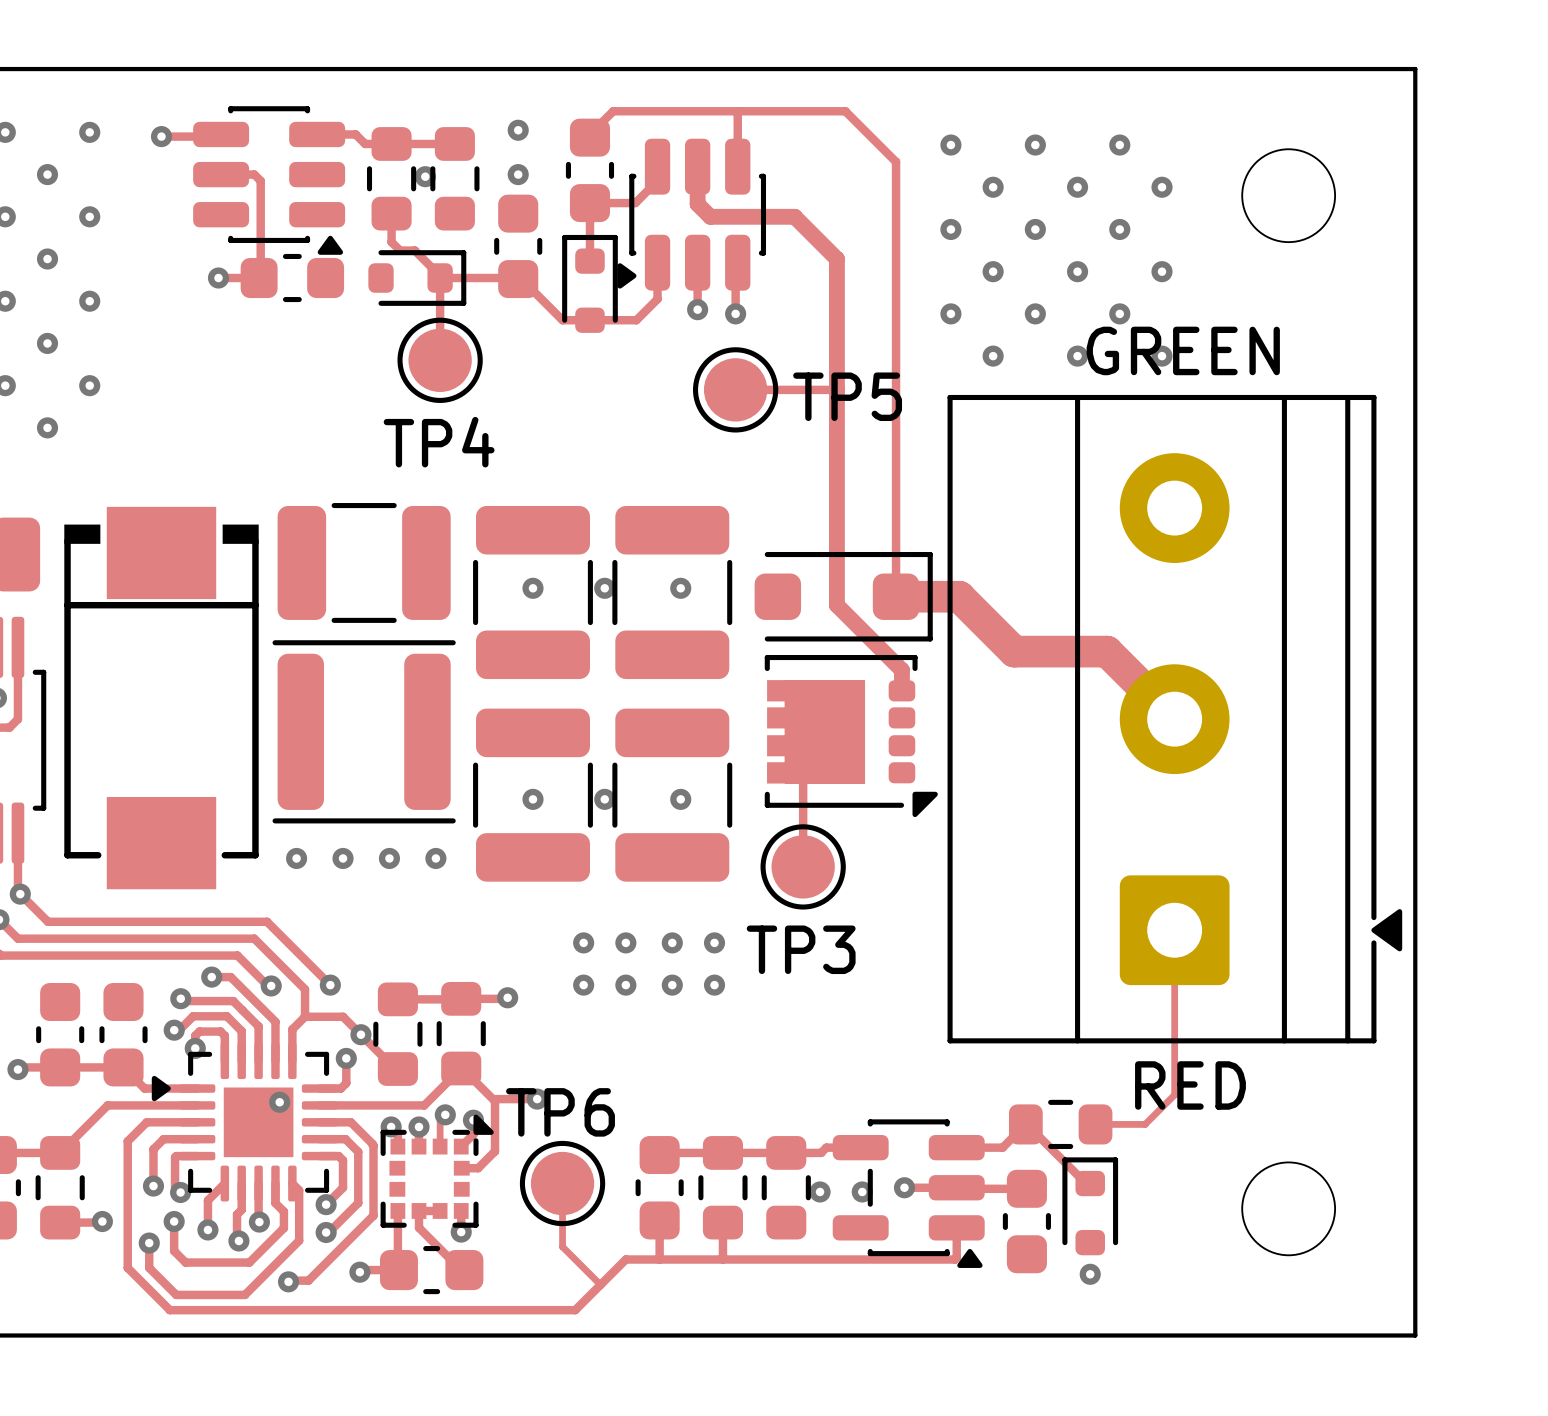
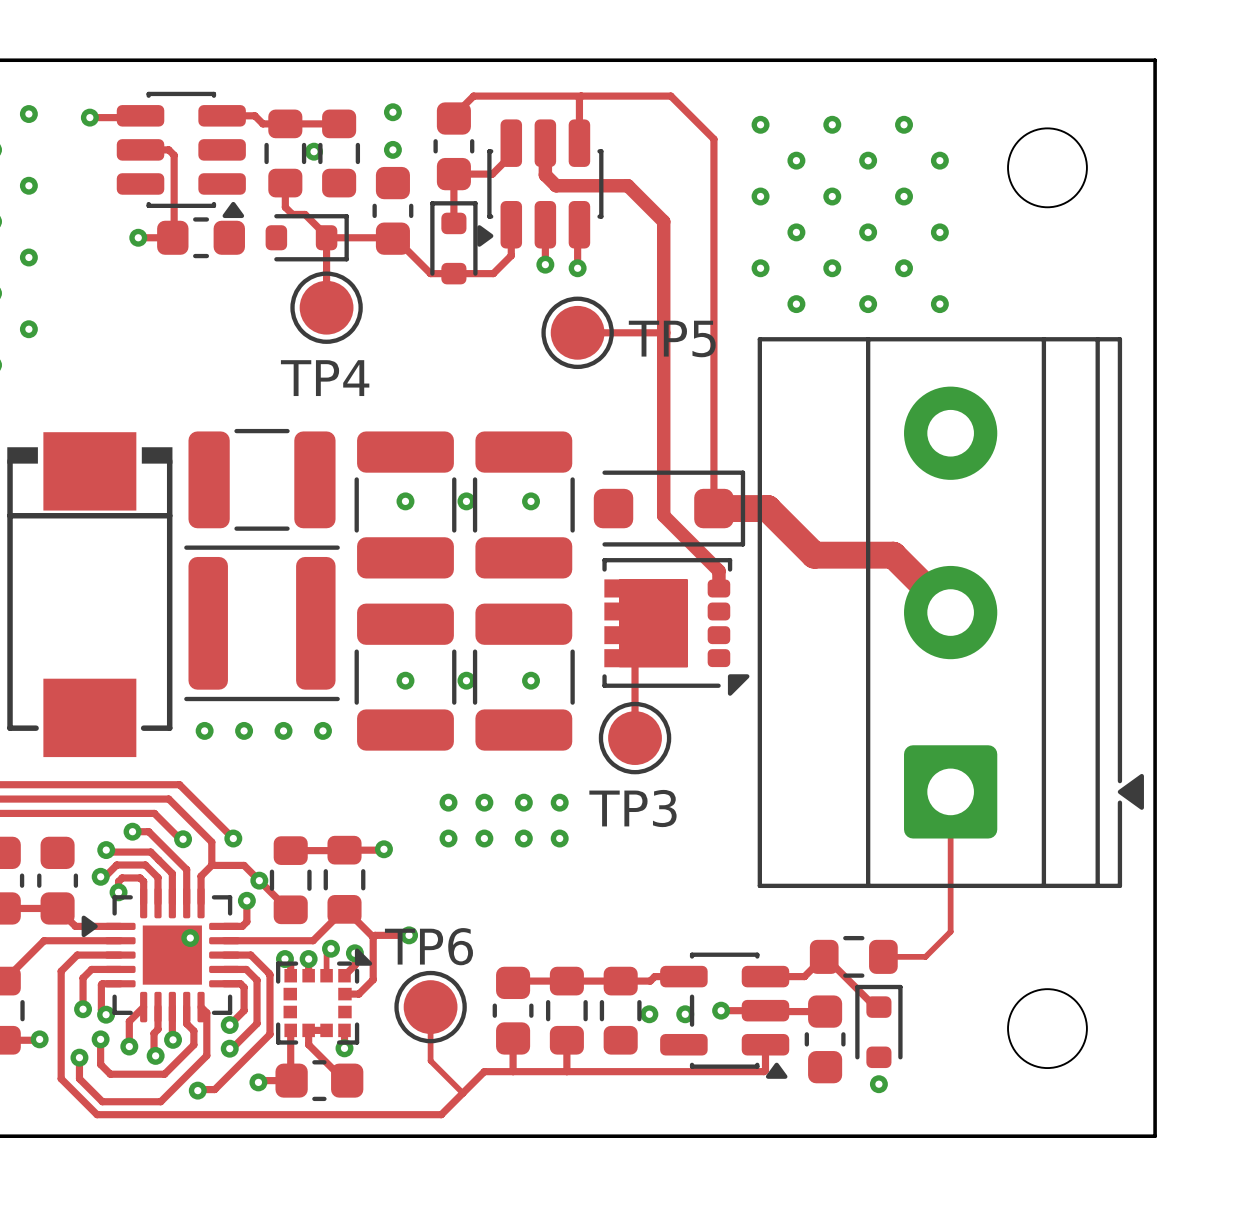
text: GREEN (1183, 350) -> none
text: RED (1190, 1085) -> none

